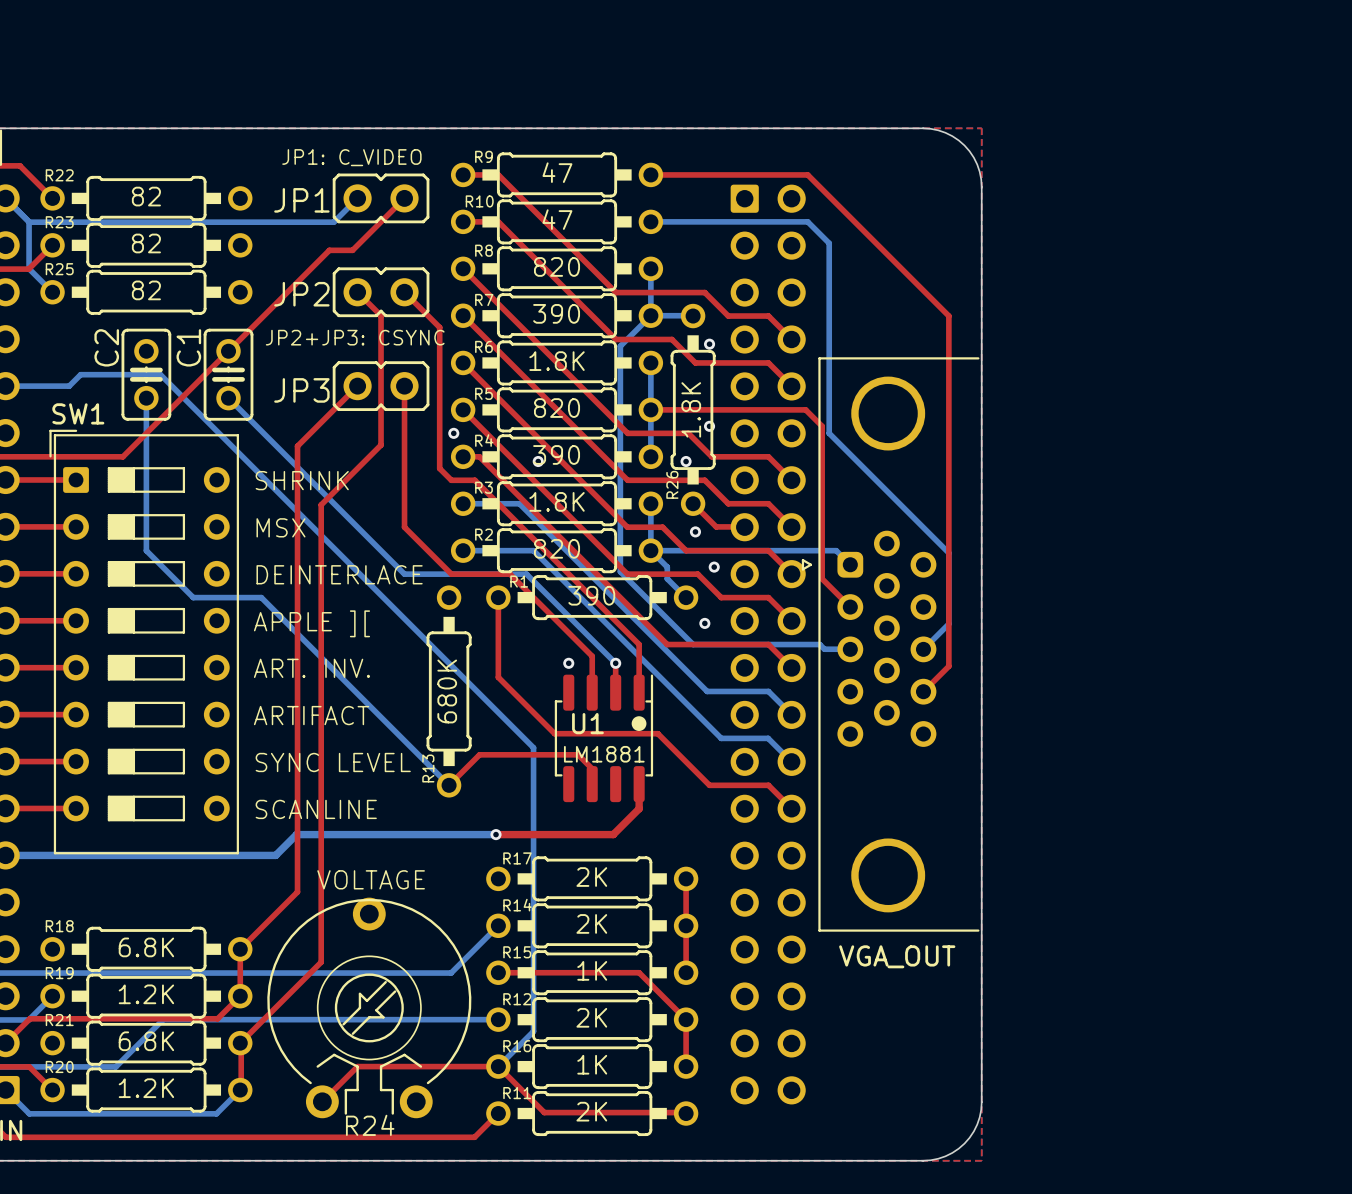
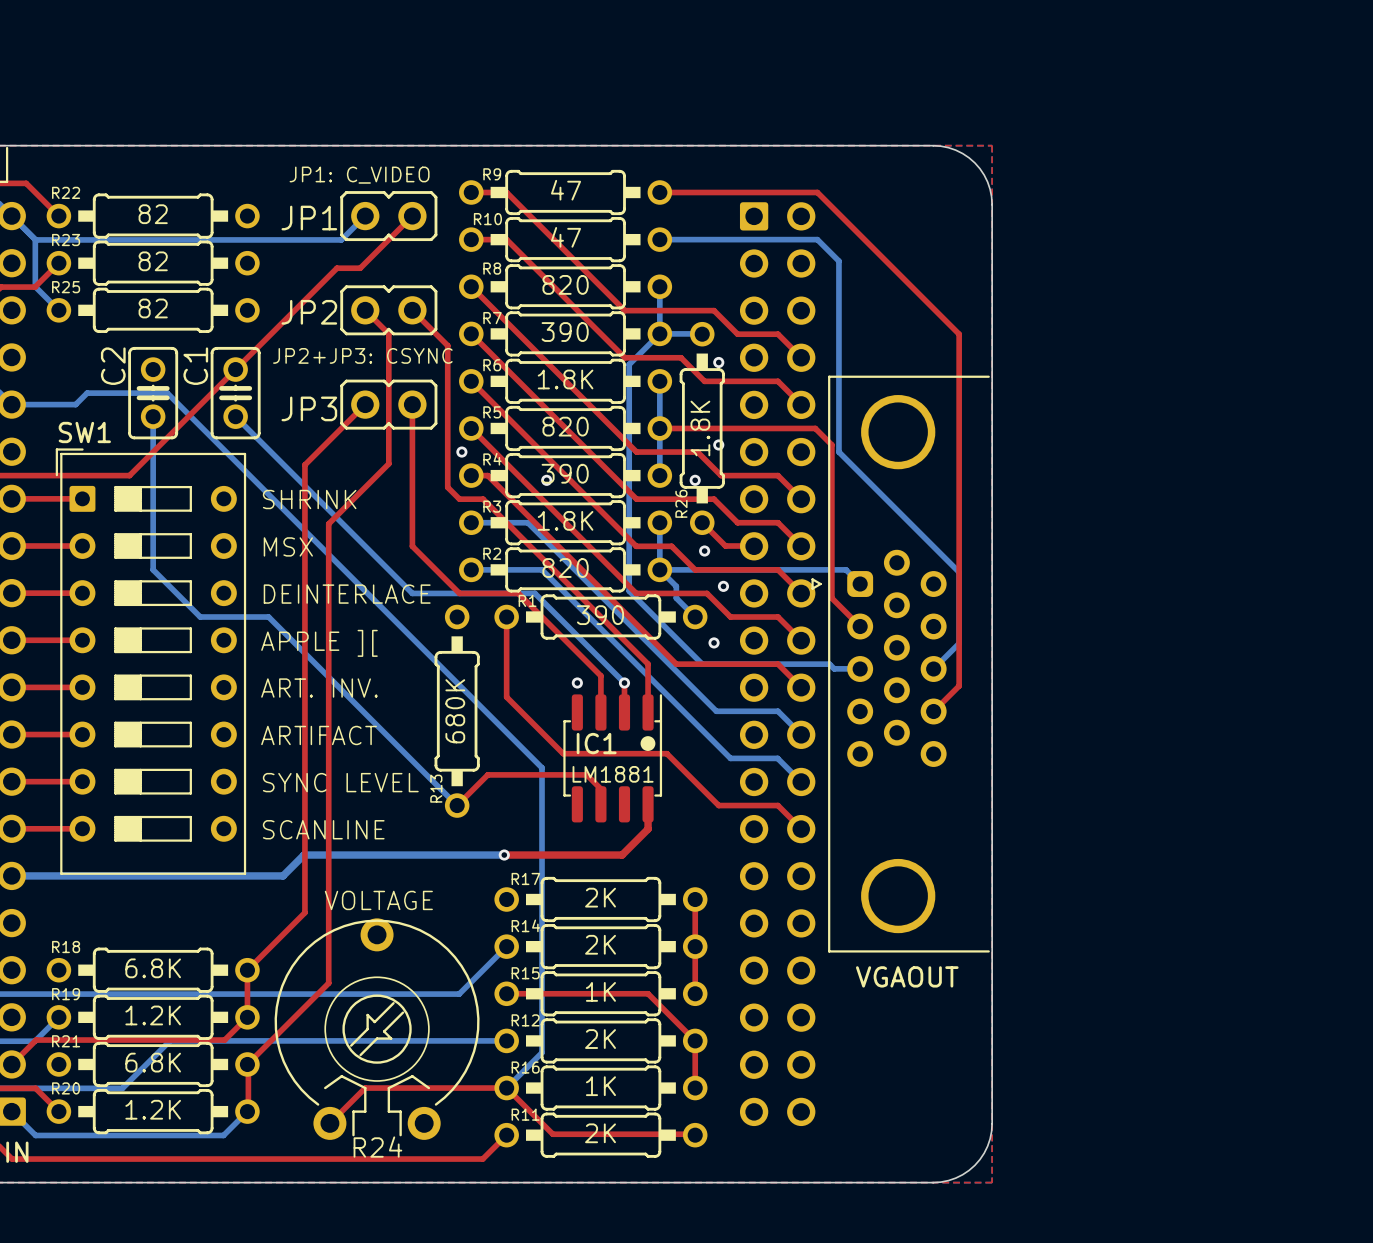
U1 name: U1 (587, 723) -> IC1 (596, 743)
VGA_OUT name: VGA_OUT (897, 956) -> VGAOUT (907, 976)

